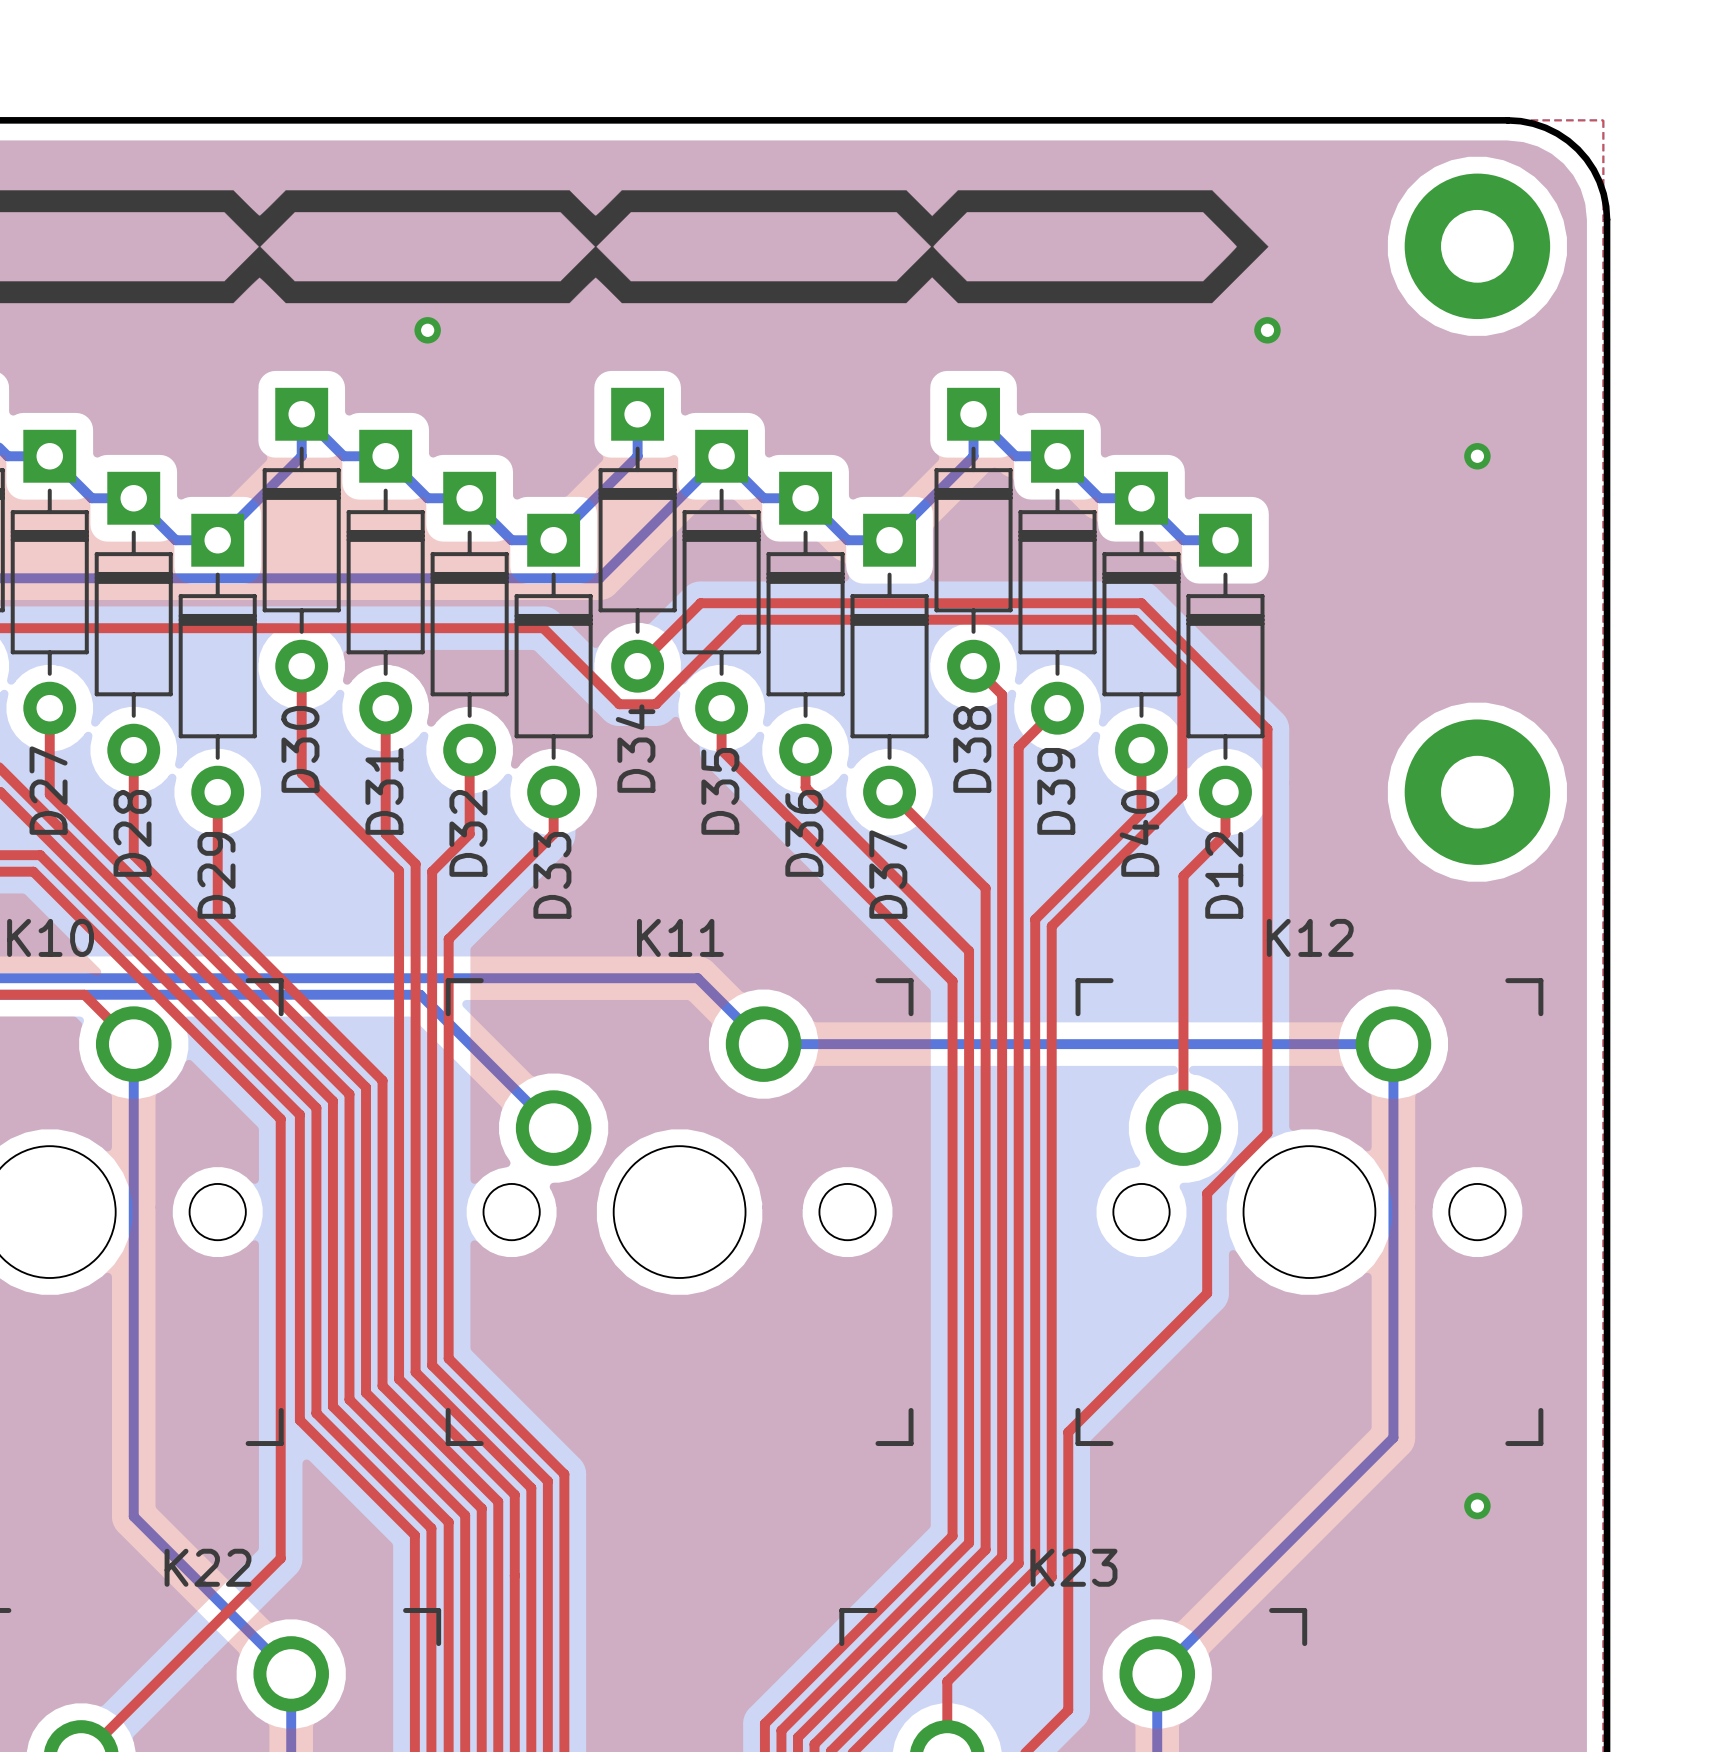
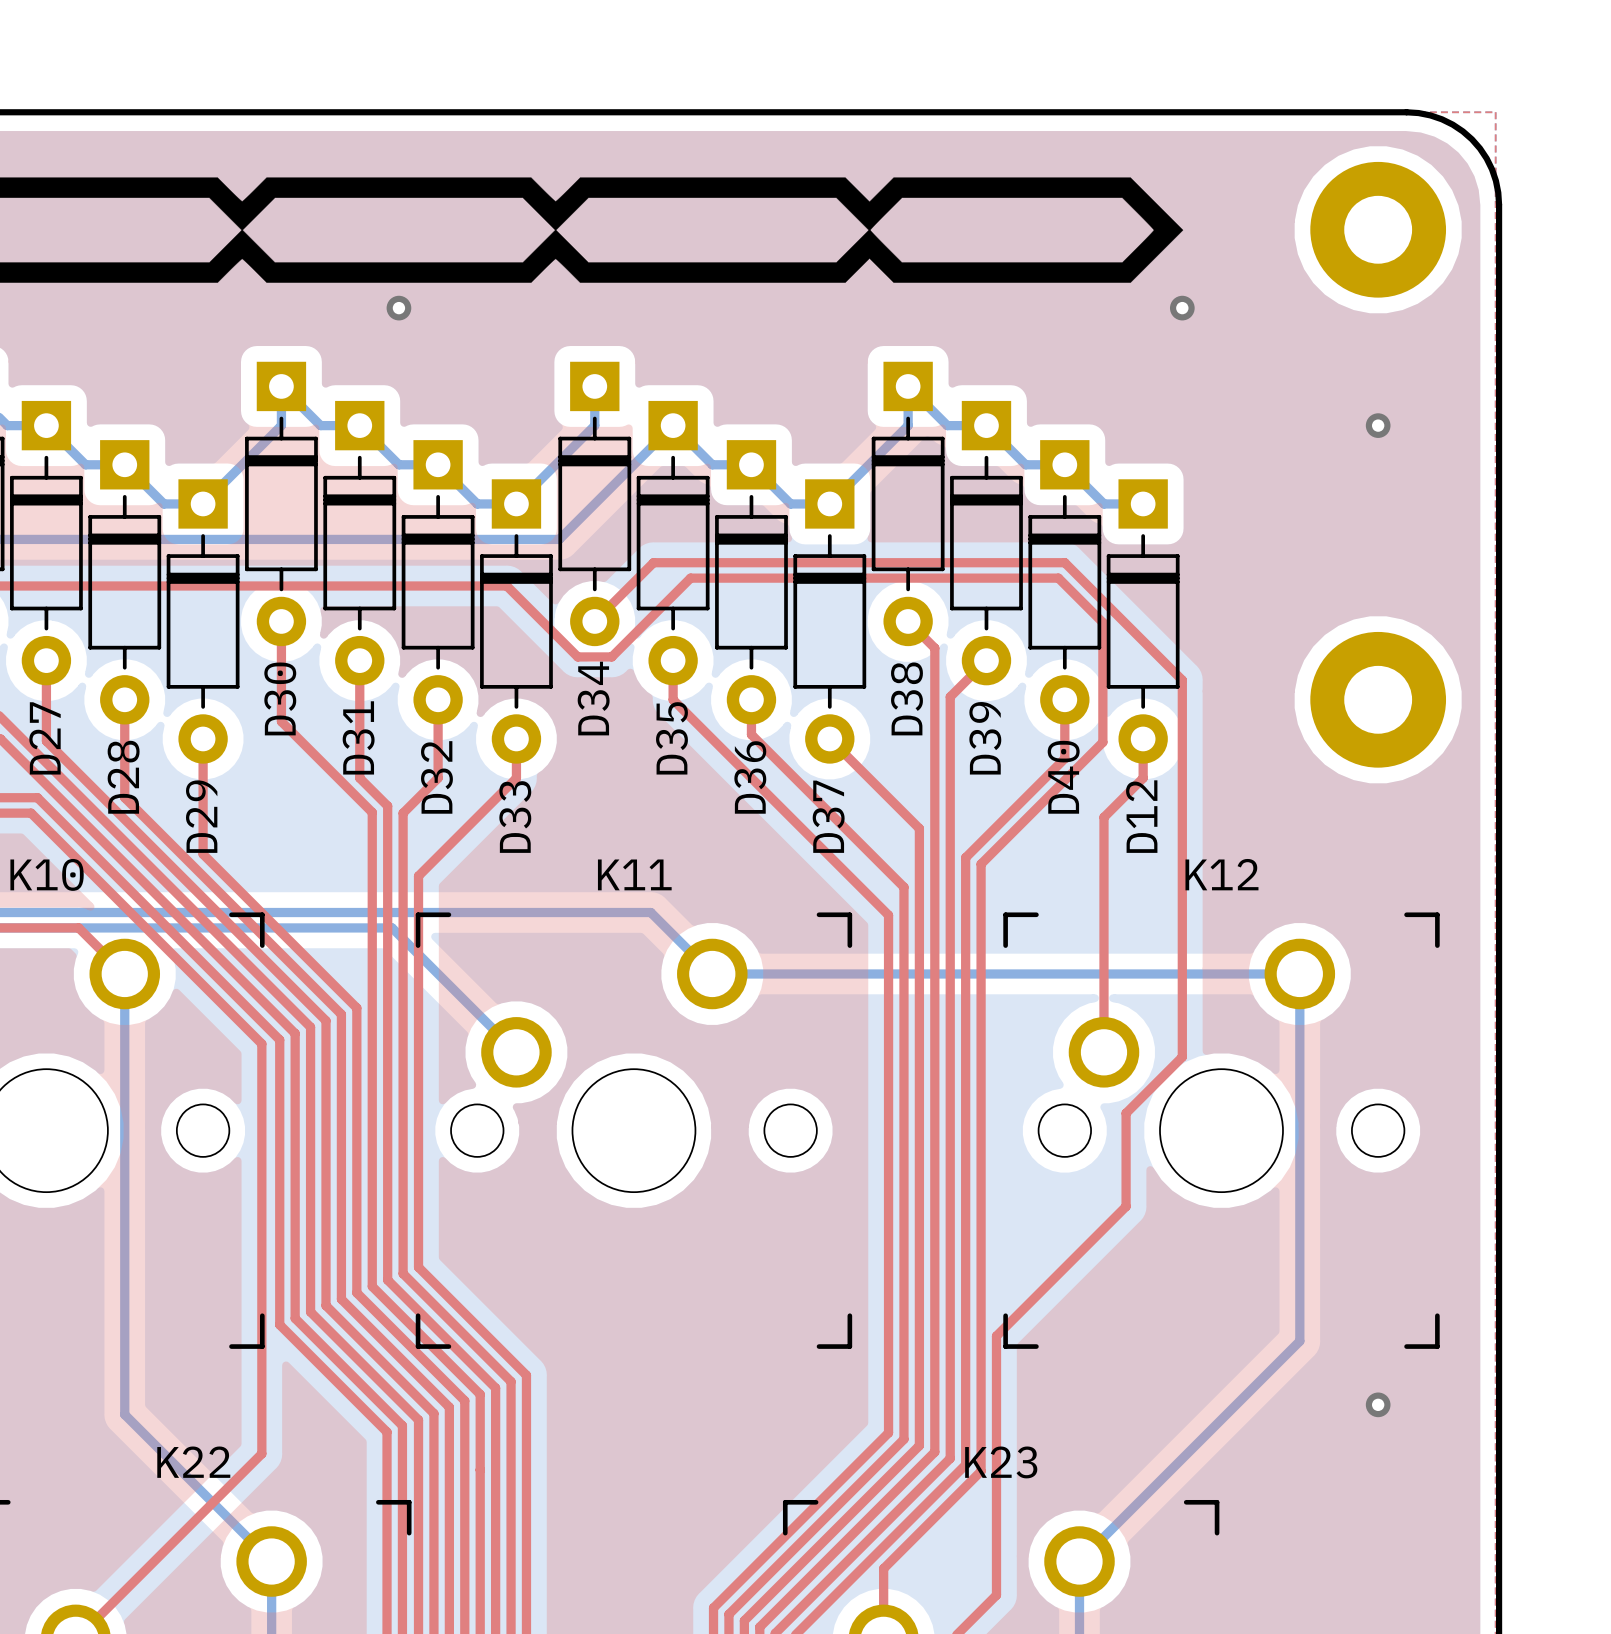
part position: (1477, 792) -> (1378, 699)

